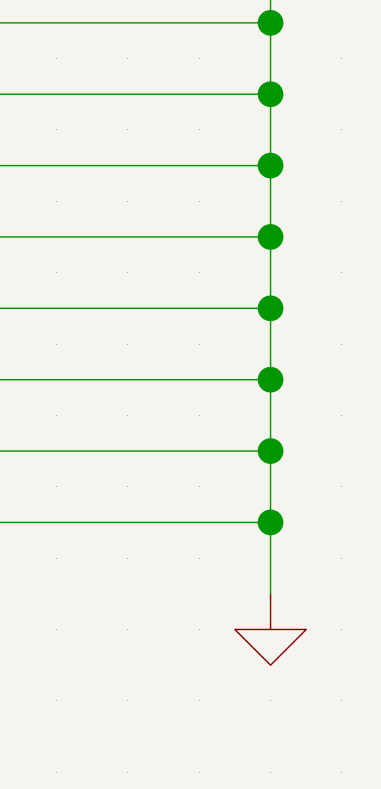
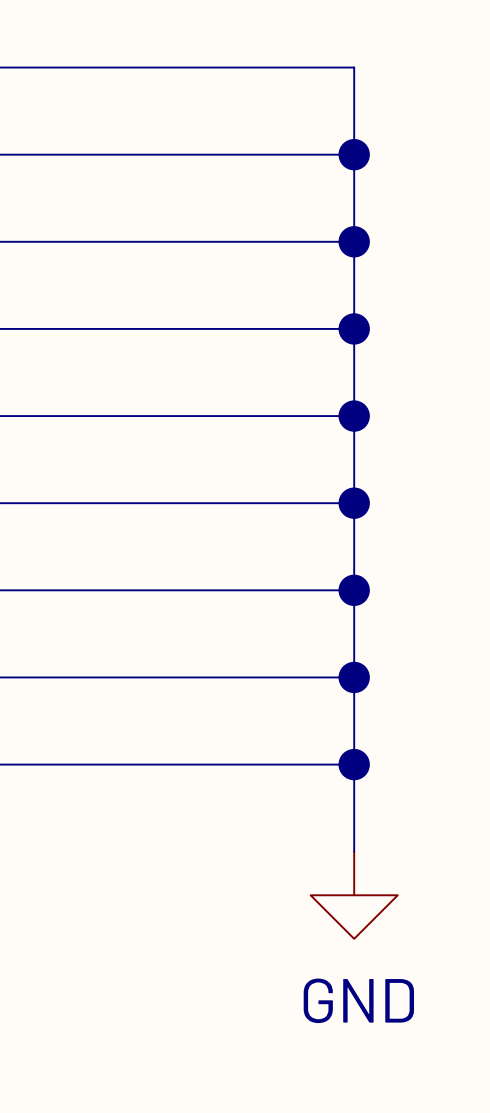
power symbol text: none -> GND (358, 1000)

